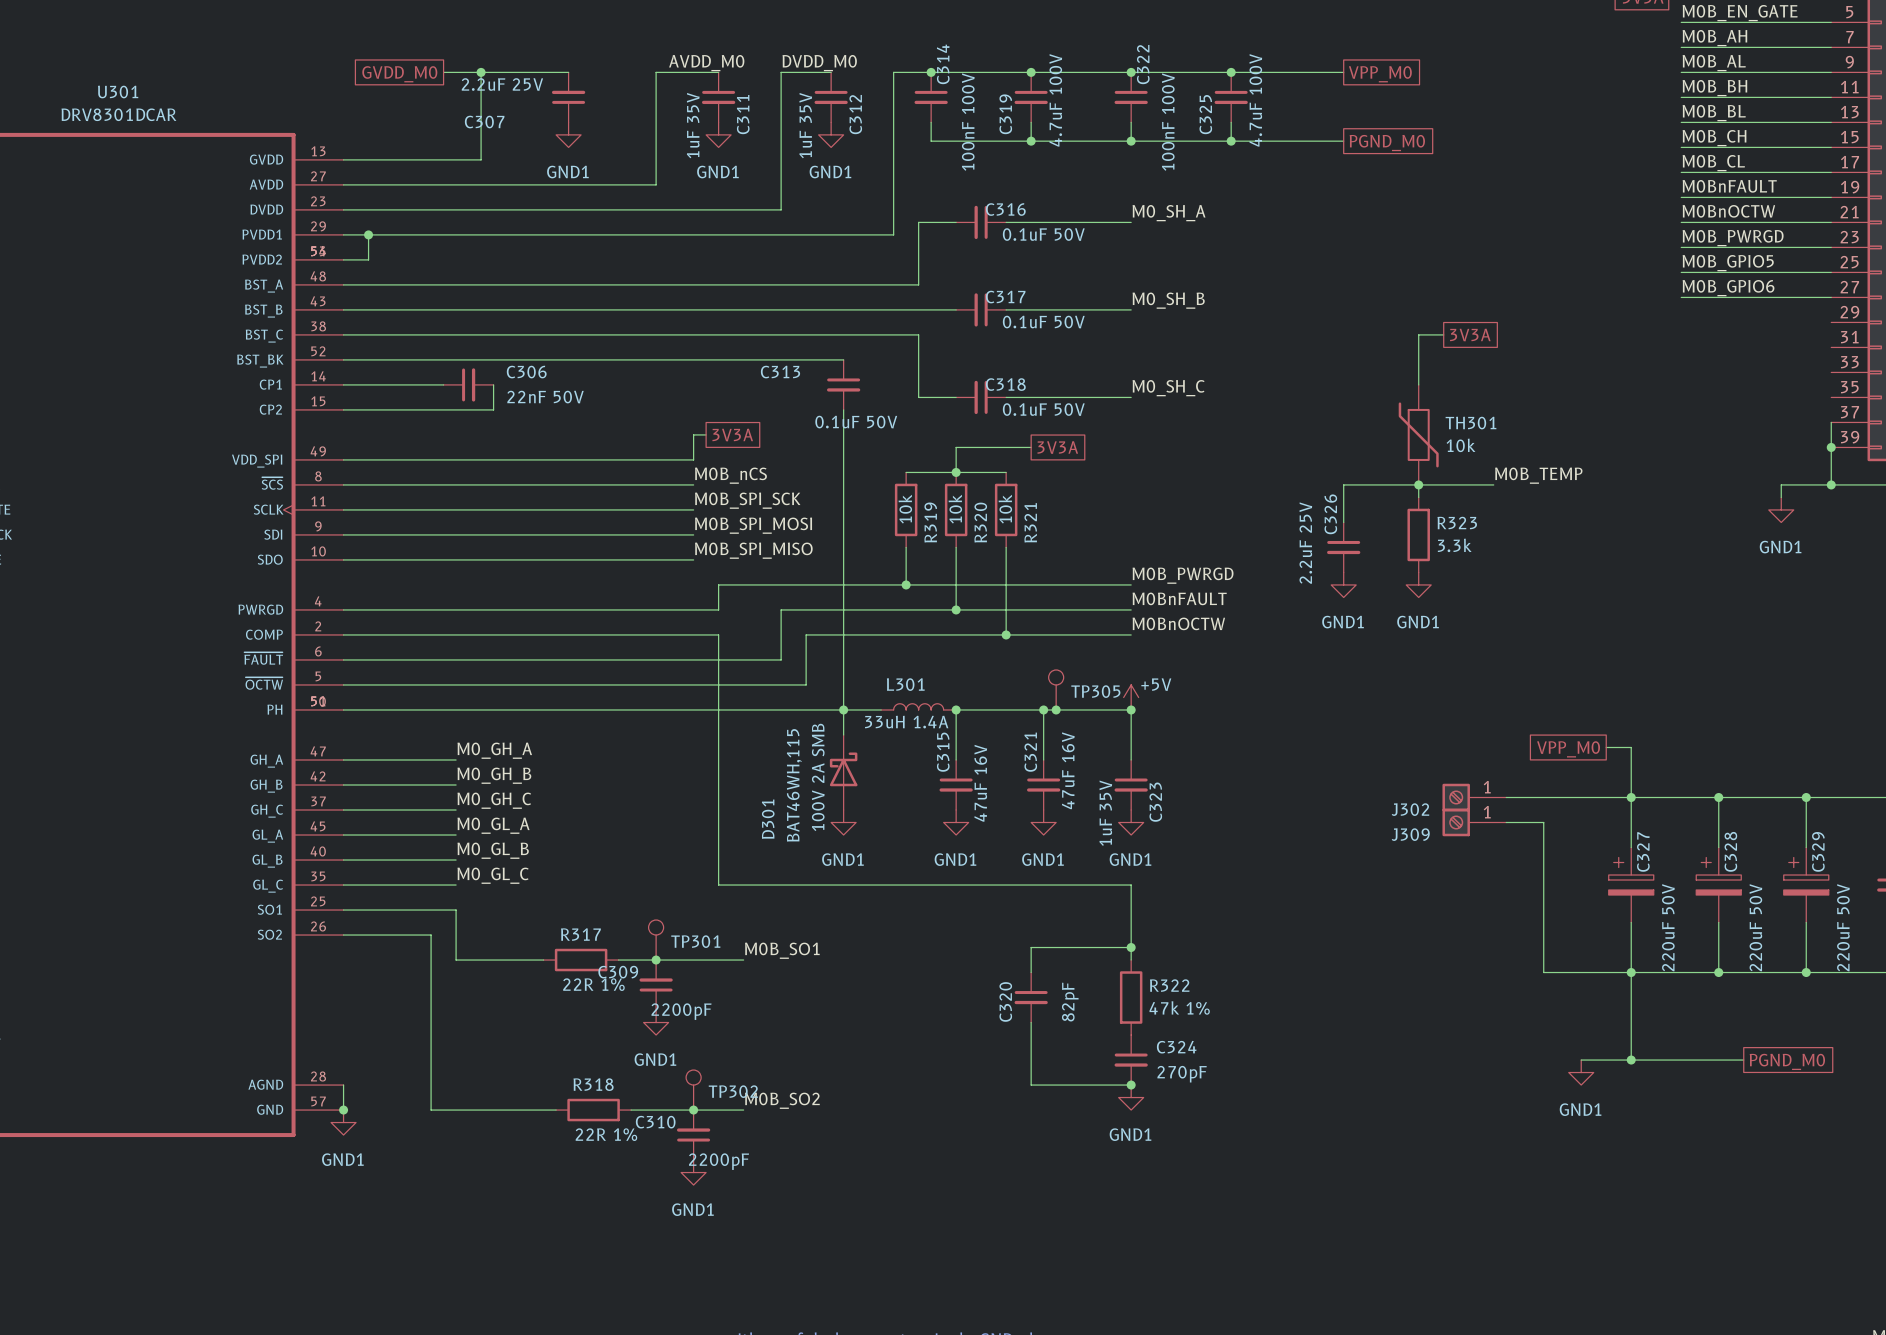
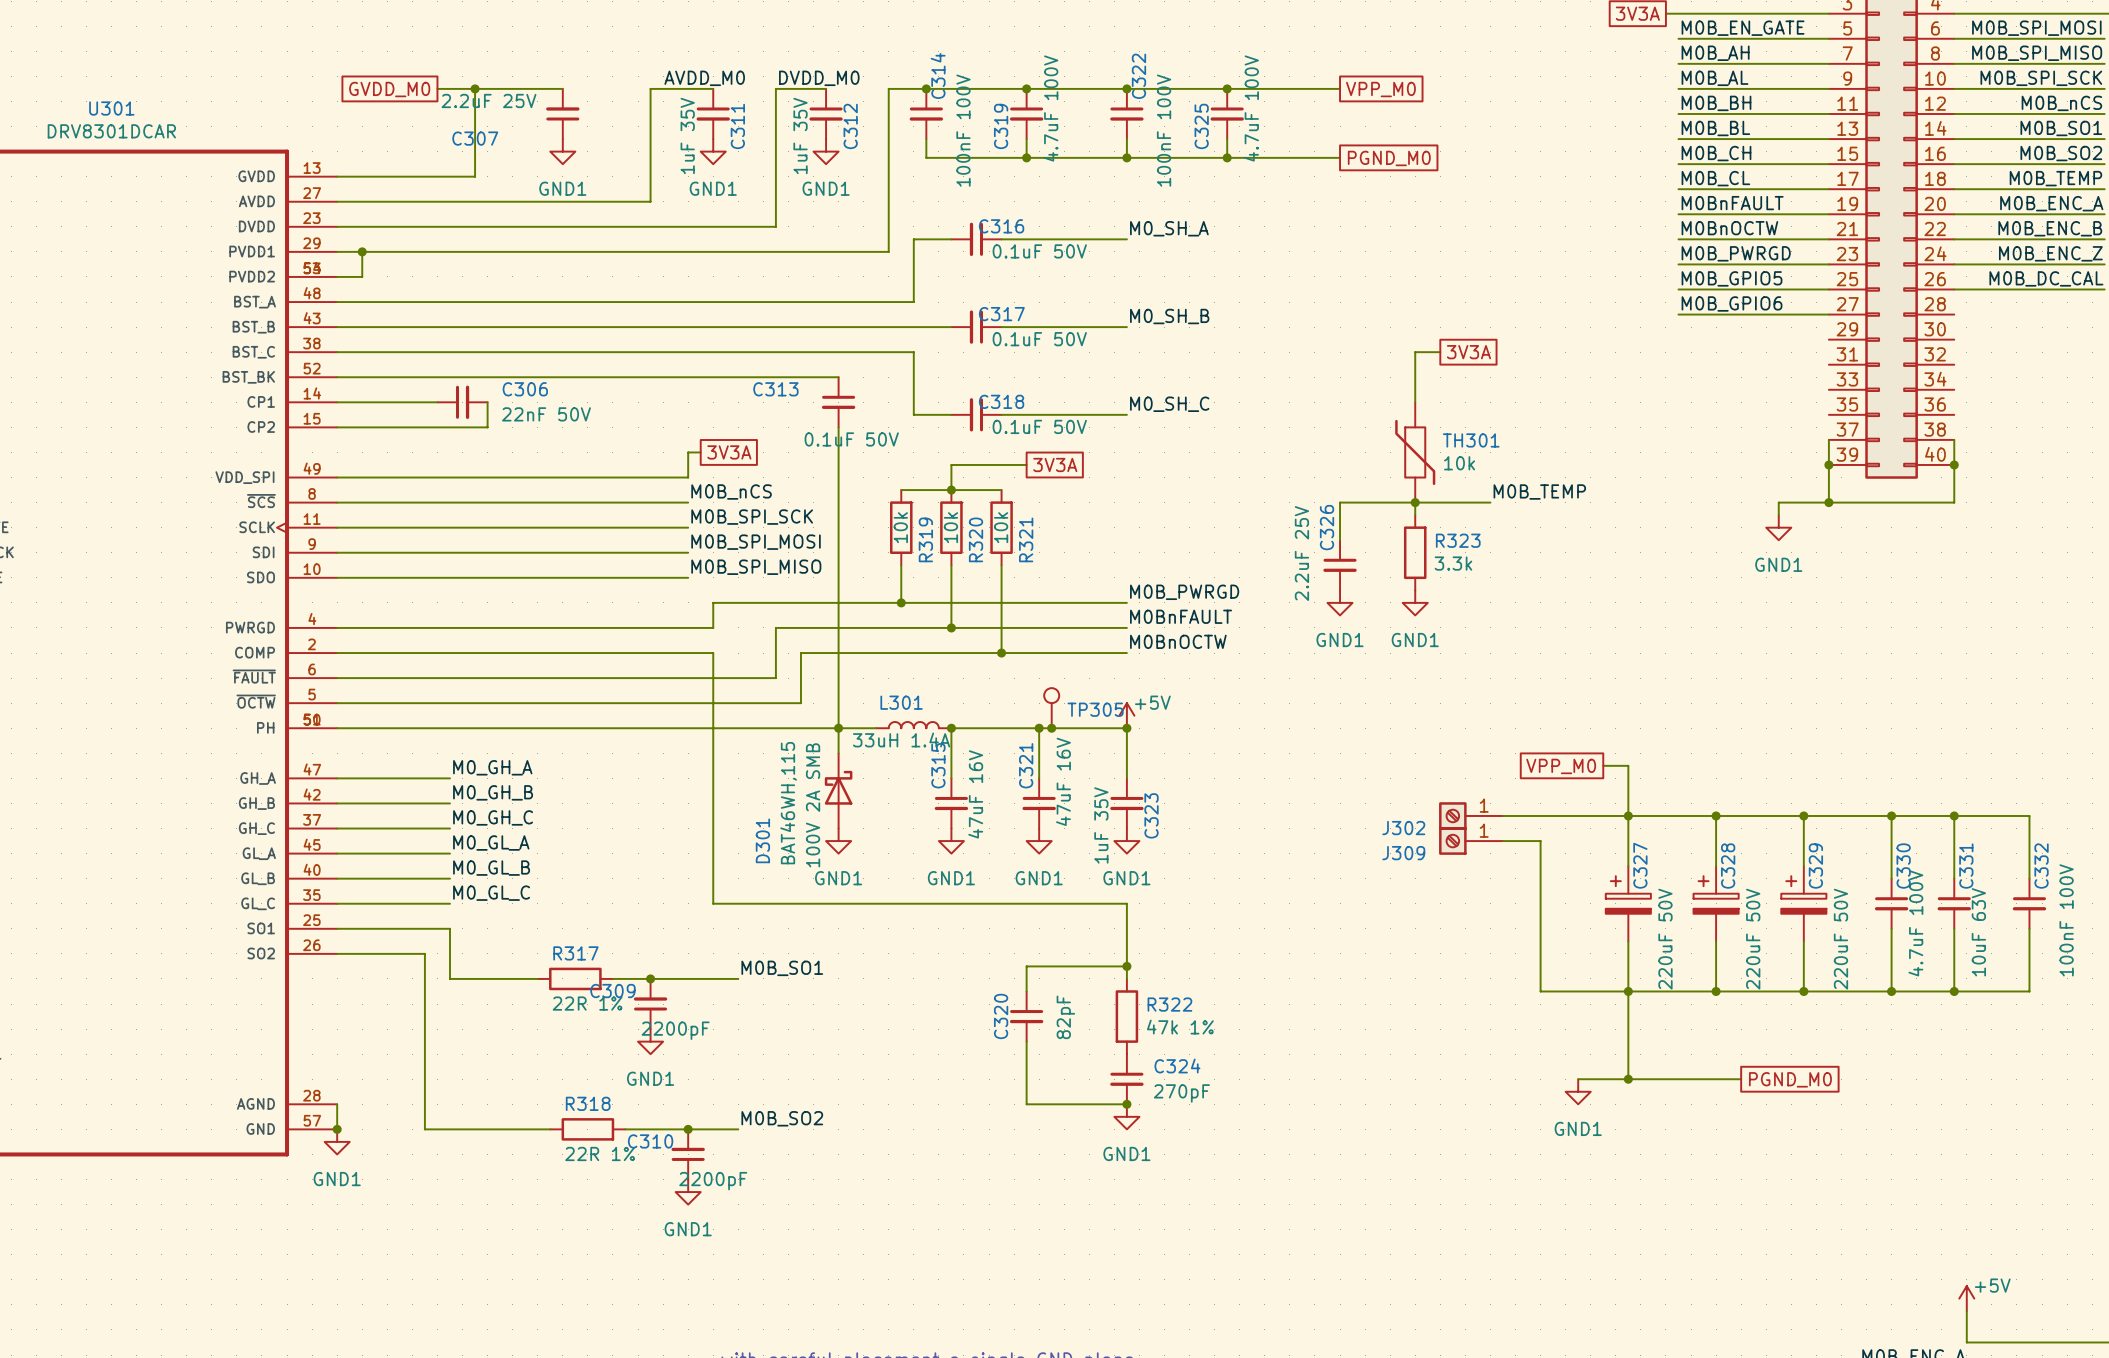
TP301: (656, 940) -> none
TP302: (693, 1090) -> none

